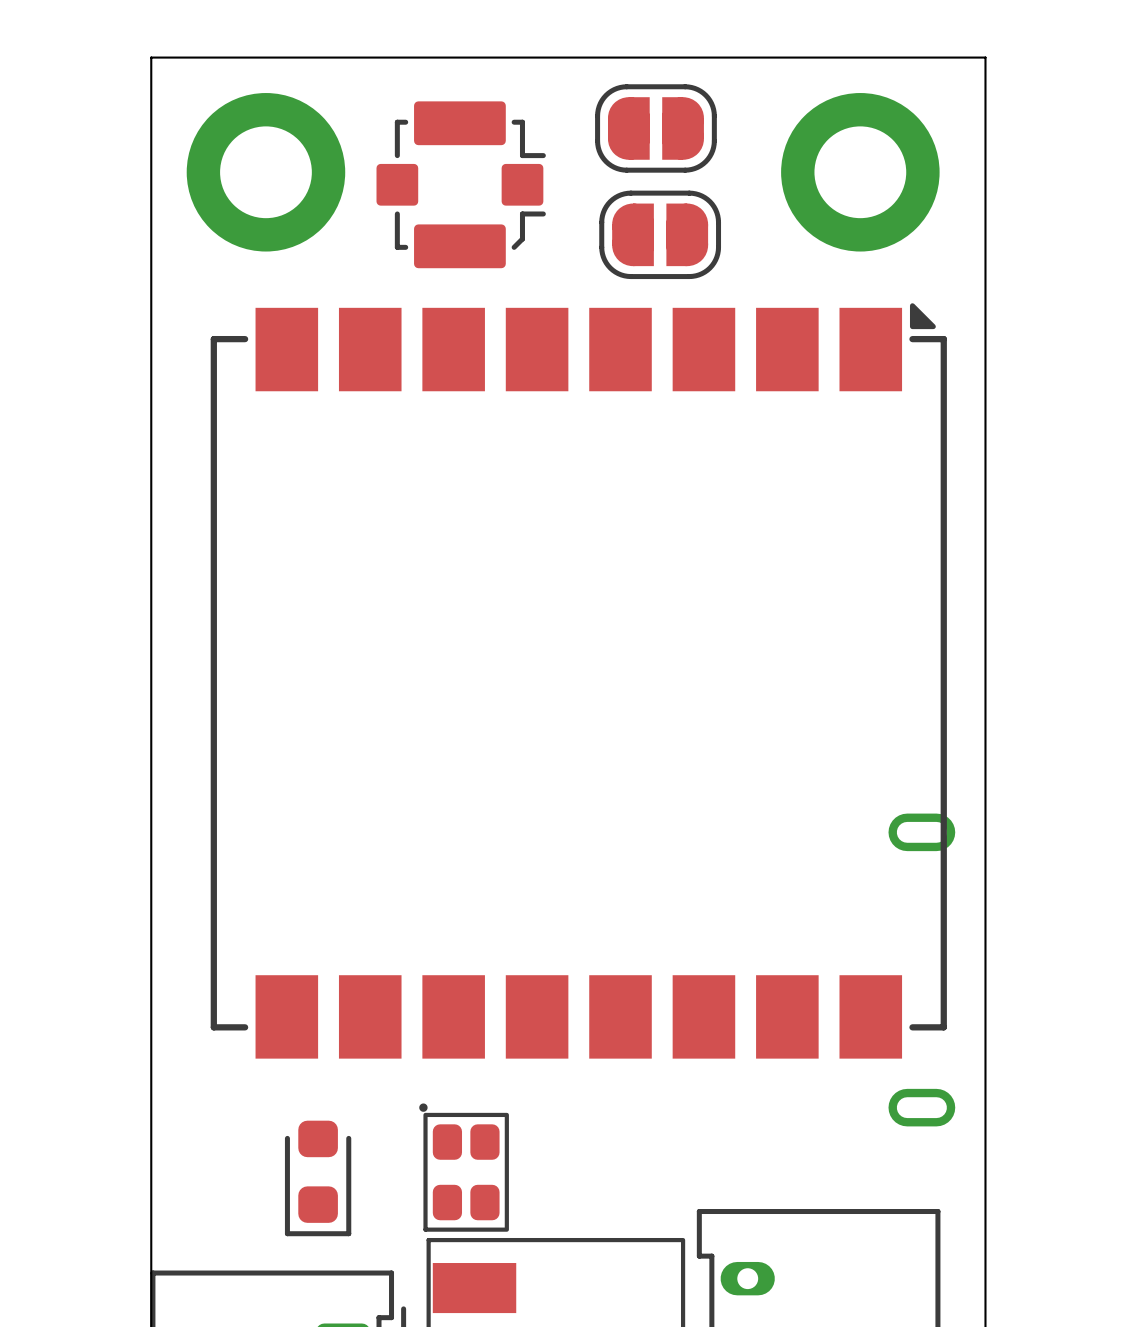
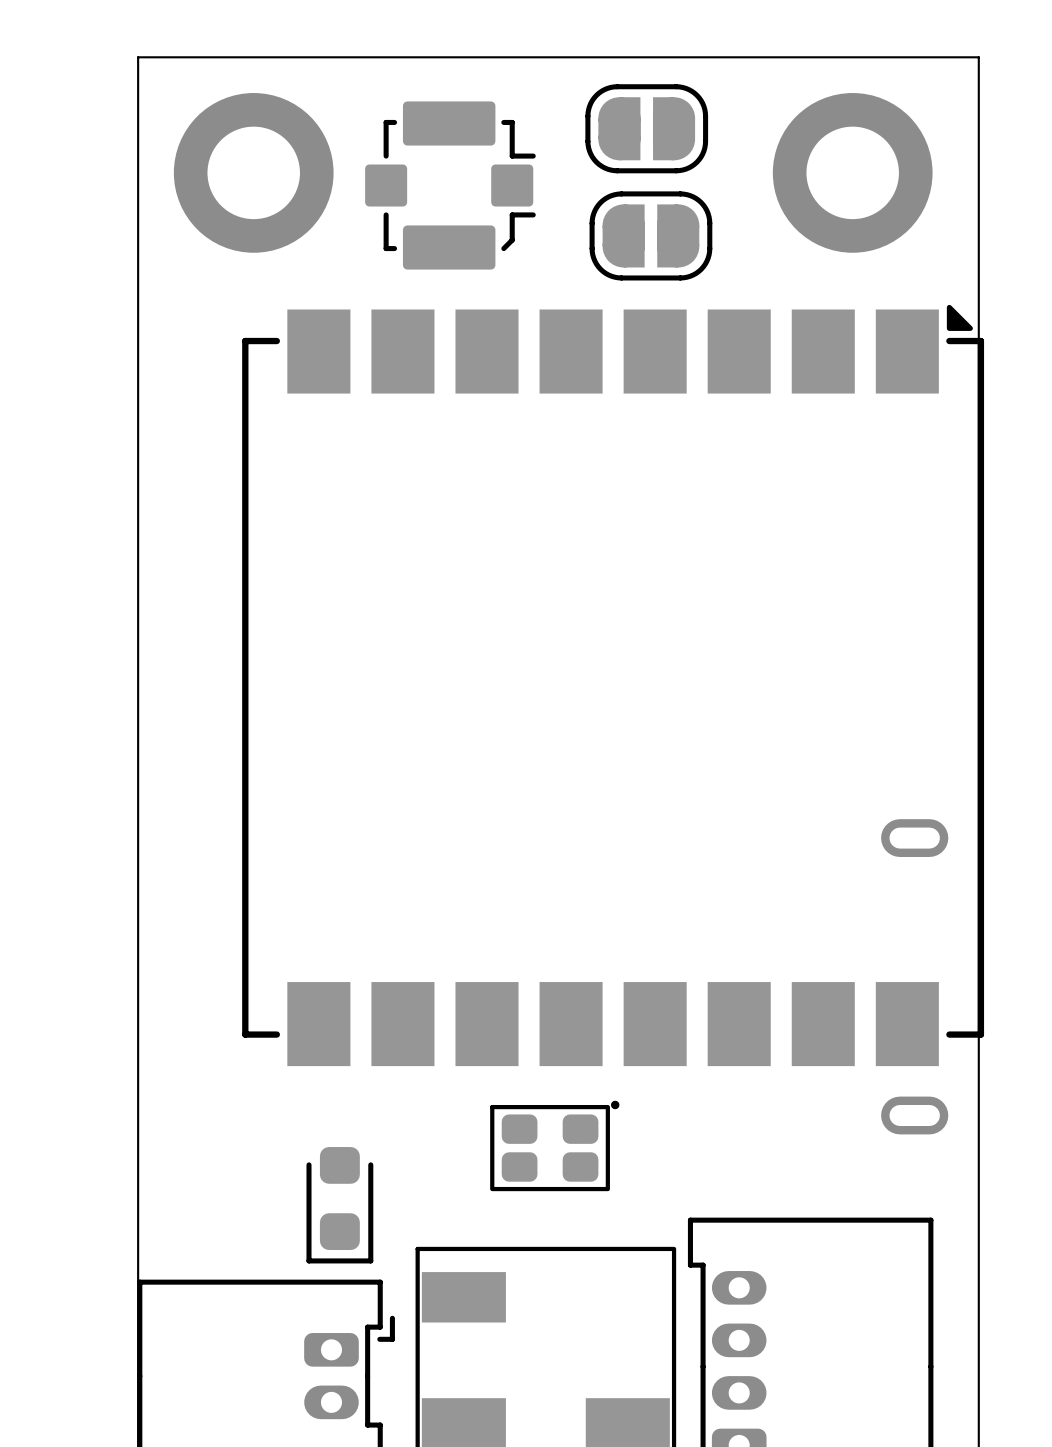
part position: (578, 680) -> (613, 685)
part rotation: 0° (464, 1167) -> 90° clockwise (554, 1145)
part position: (464, 1167) -> (554, 1145)
part position: (318, 1178) -> (339, 1205)

